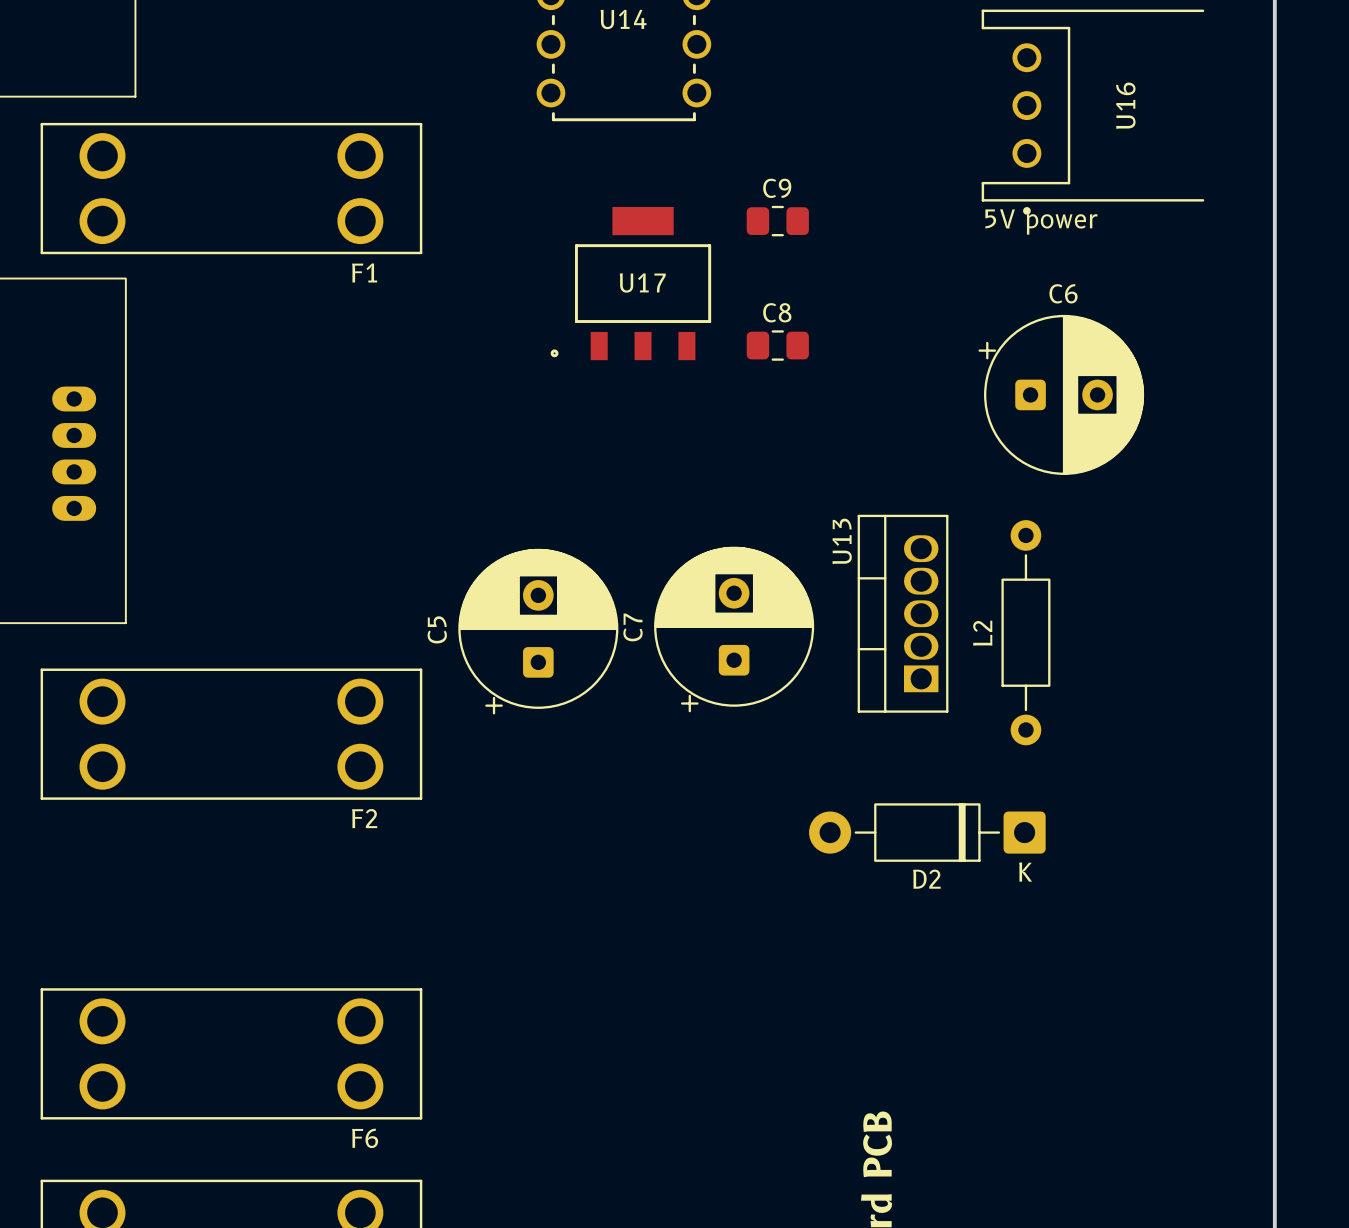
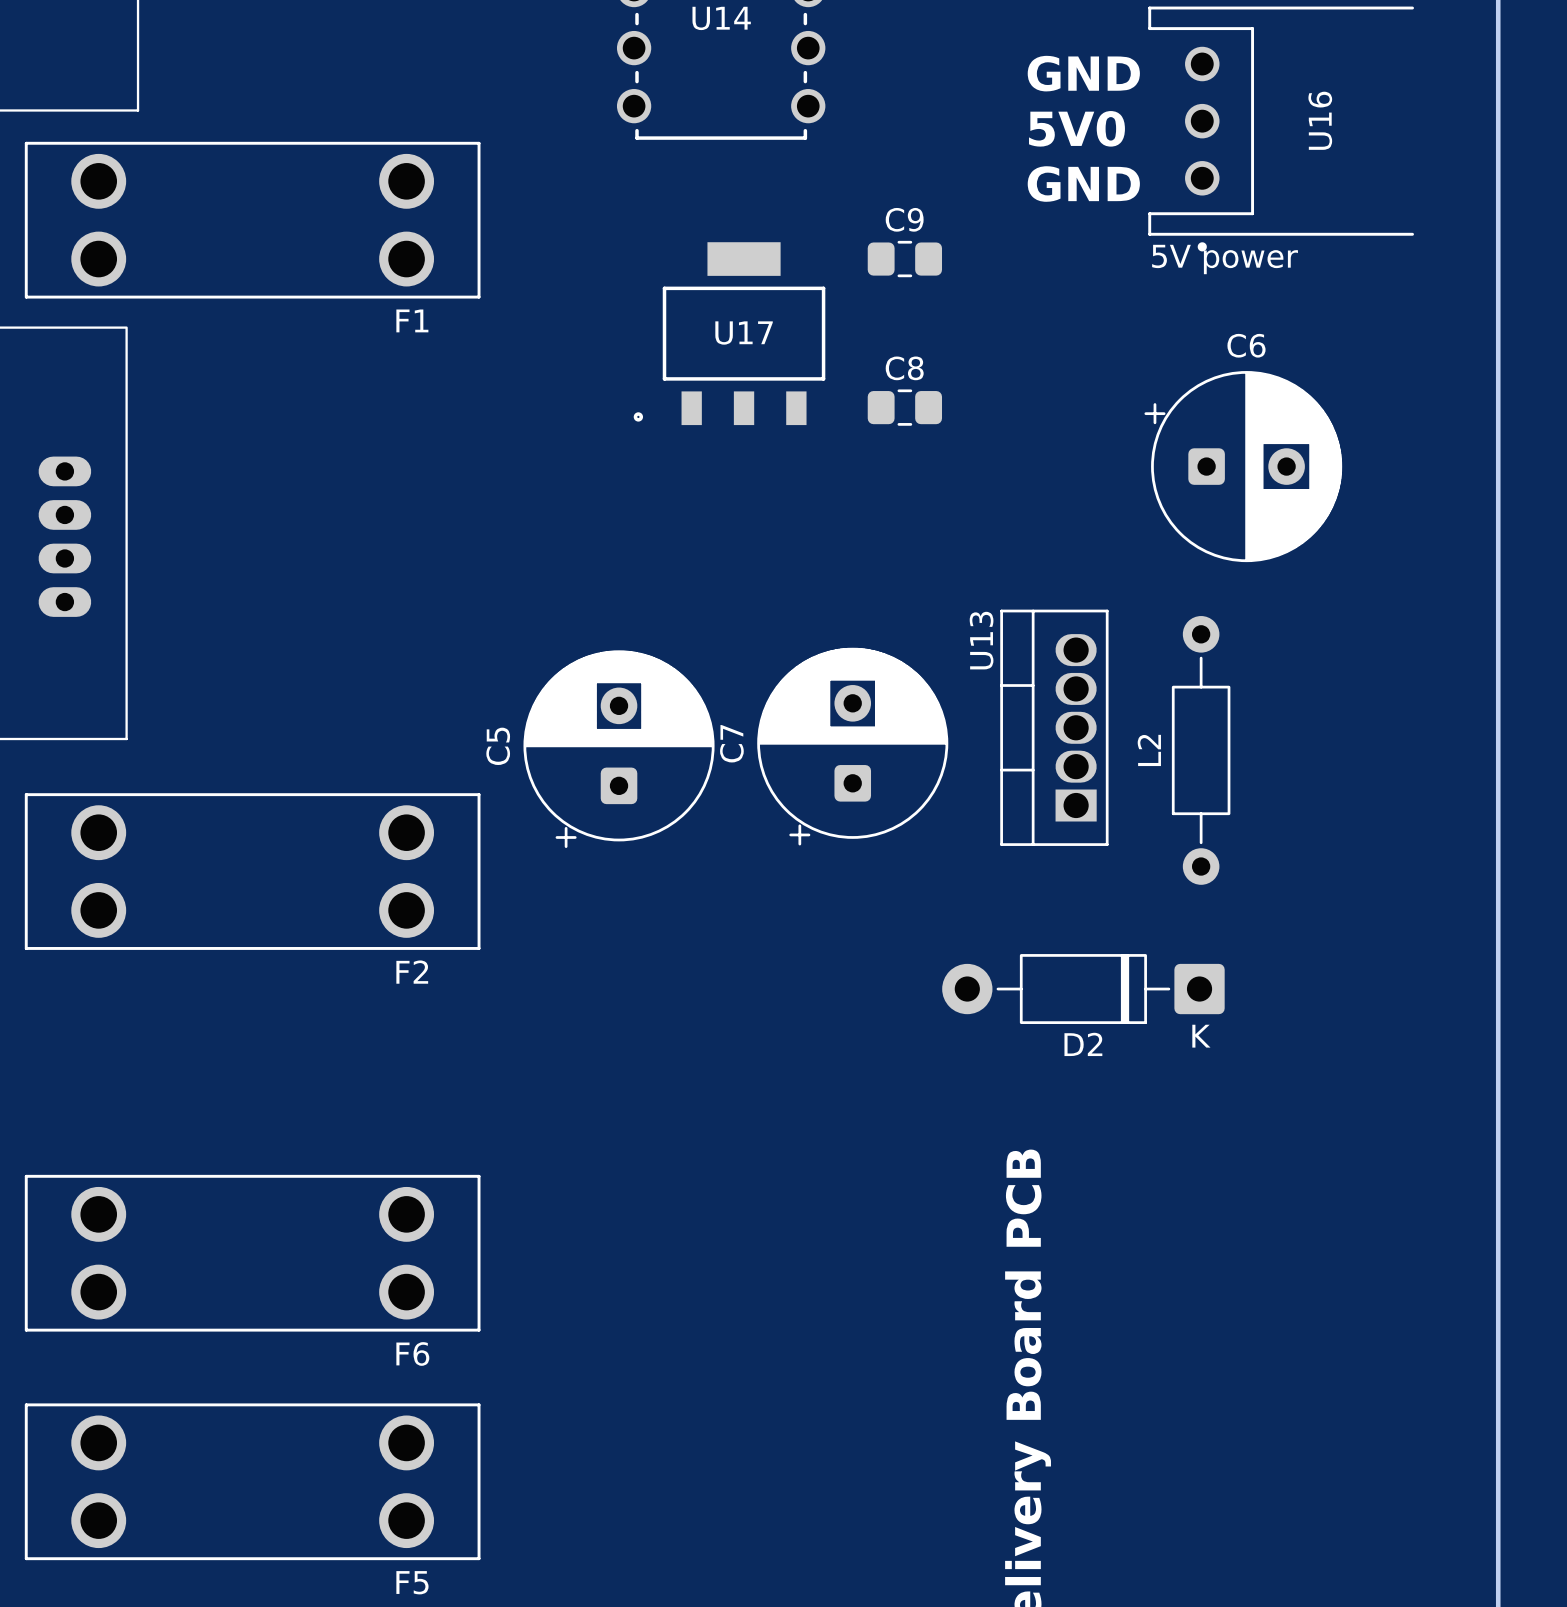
text: none -> GND (1083, 73)
text: none -> 5V0 (1076, 128)
text: none -> GND (1083, 184)

